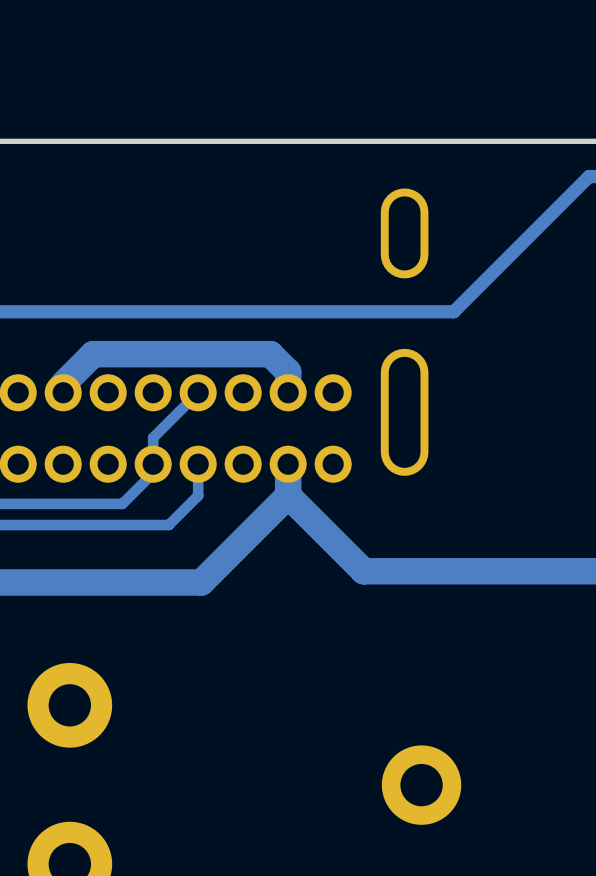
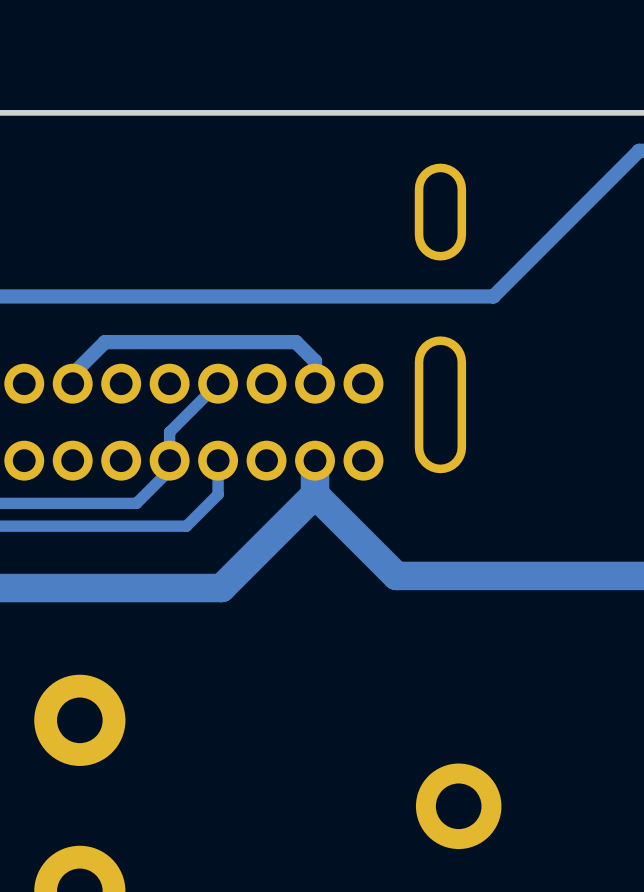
track width: thick (63, 384) (93, 354) (270, 354) (288, 371) (288, 398) -> thin (72, 374) (104, 342) (295, 342) (315, 361) (315, 389)

